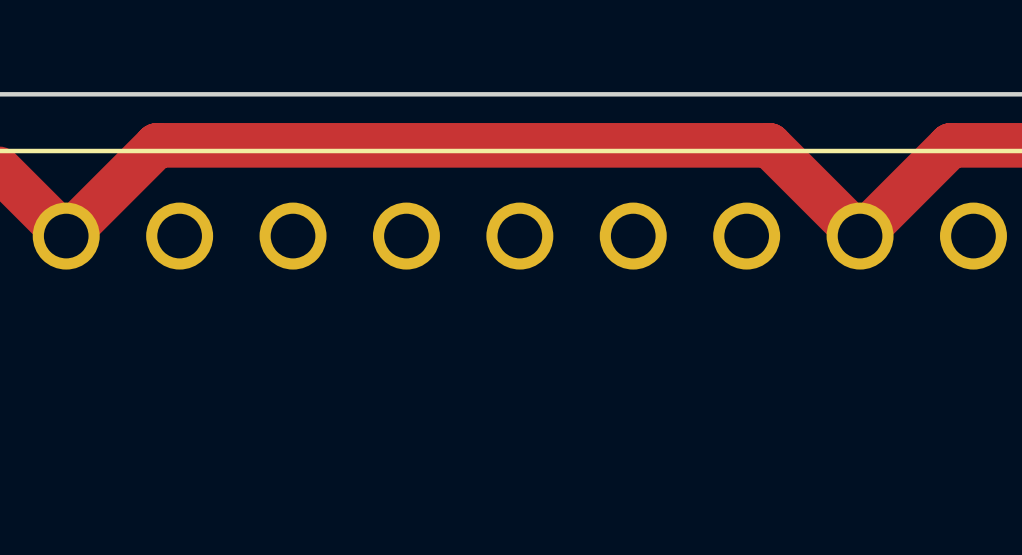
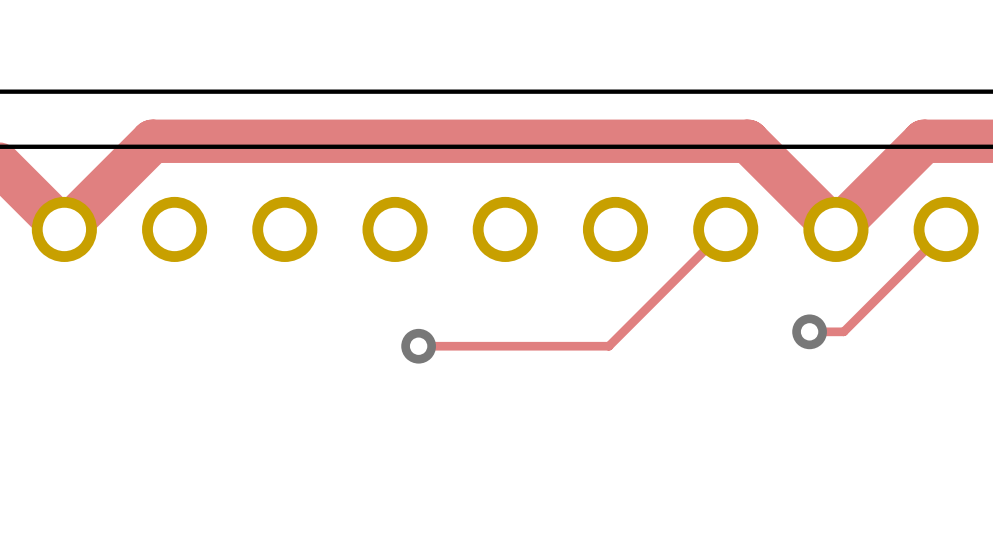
track: none -> (725, 229) (608, 346) (418, 346)
track: none -> (946, 229) (843, 331) (809, 331)
via: none -> (809, 331)
via: none -> (418, 346)

